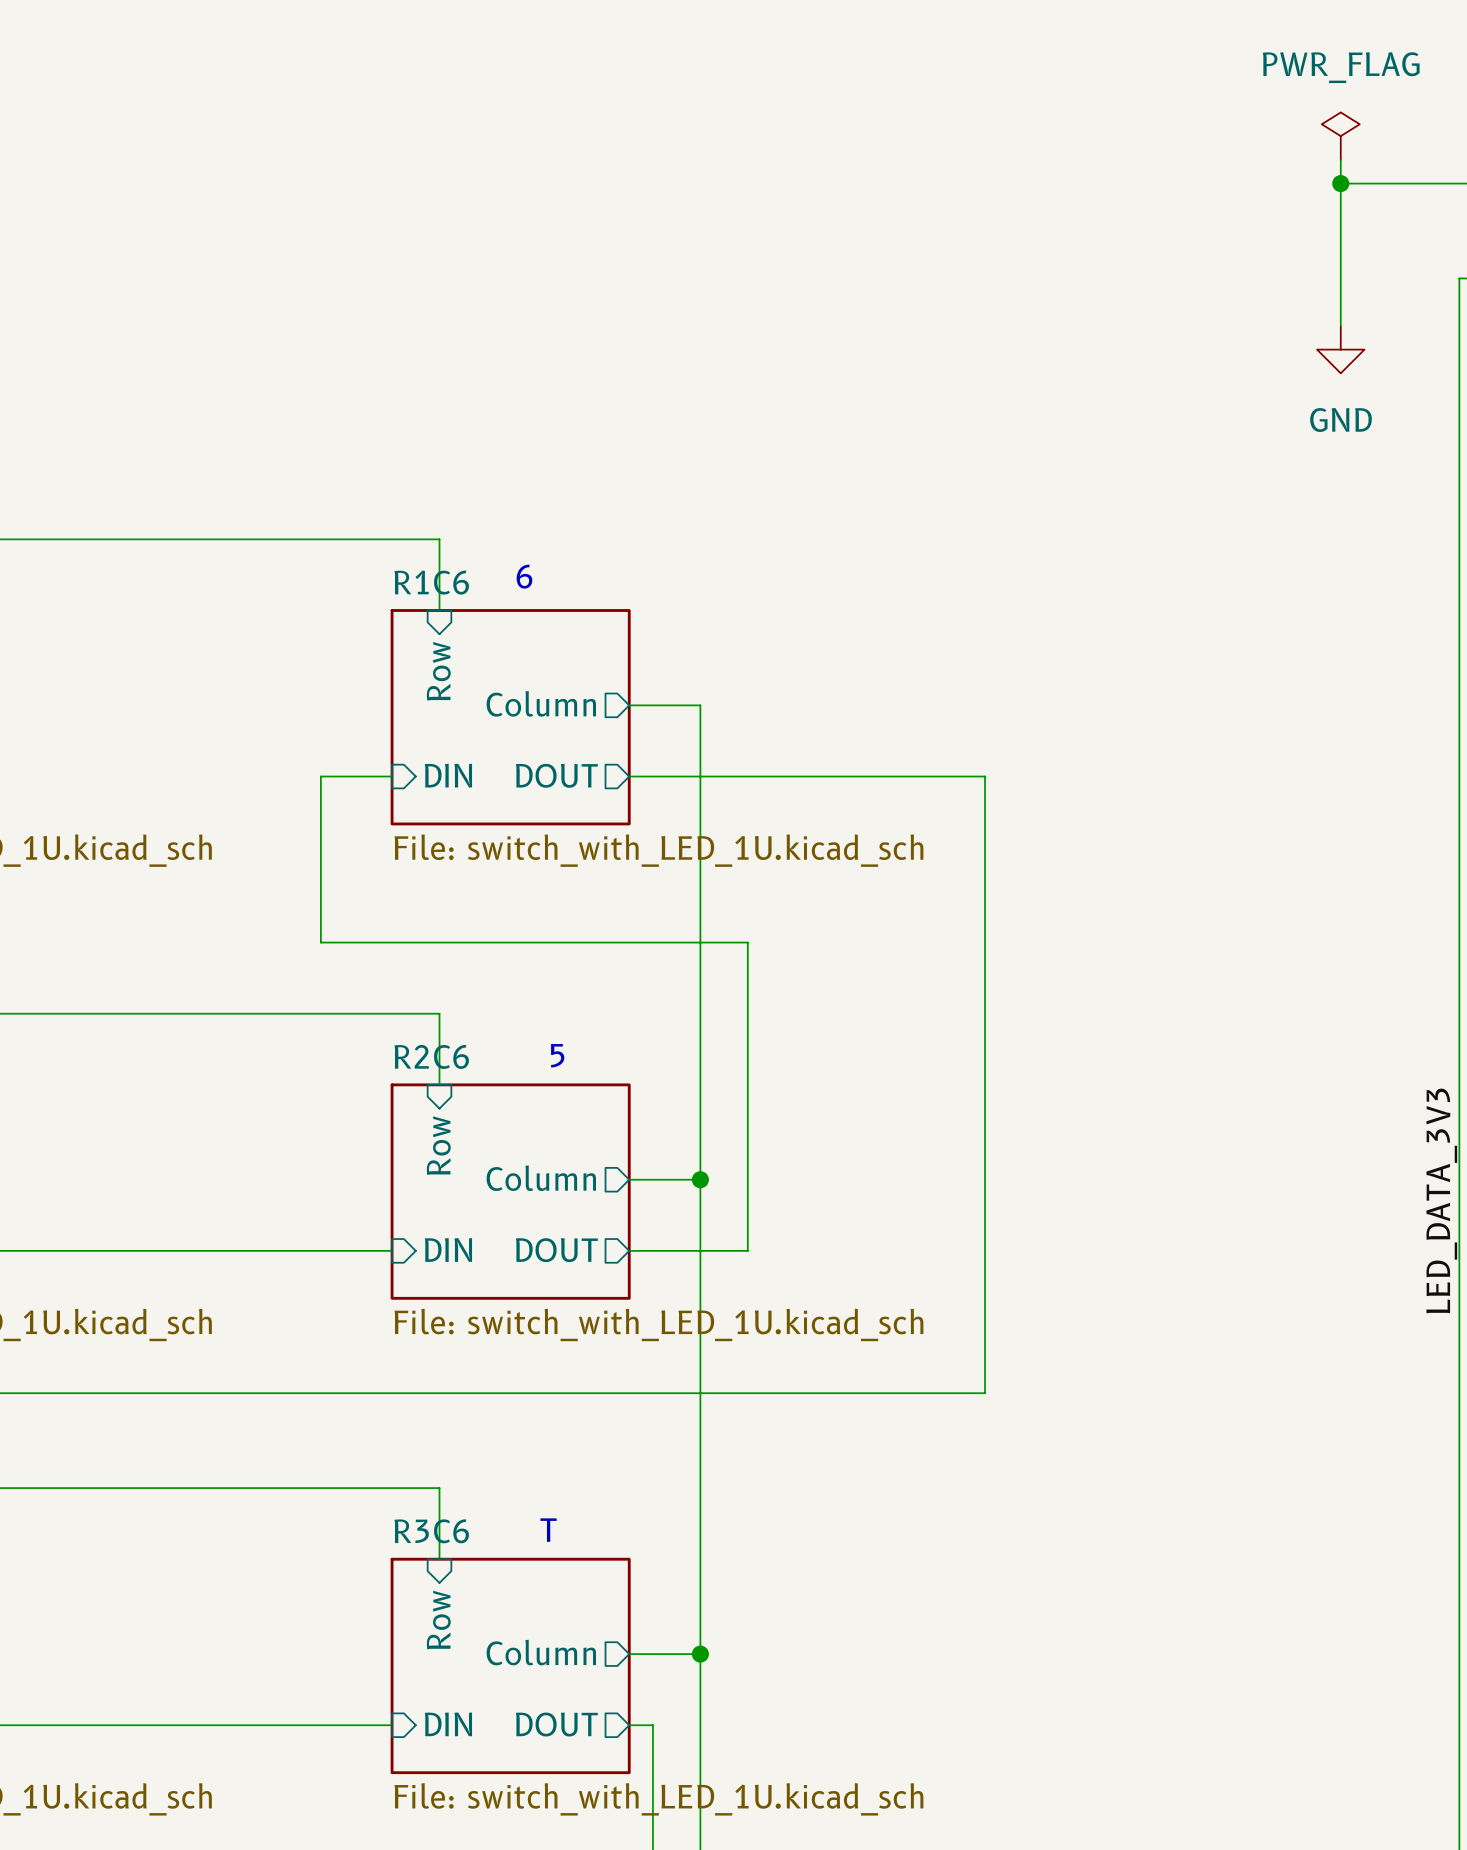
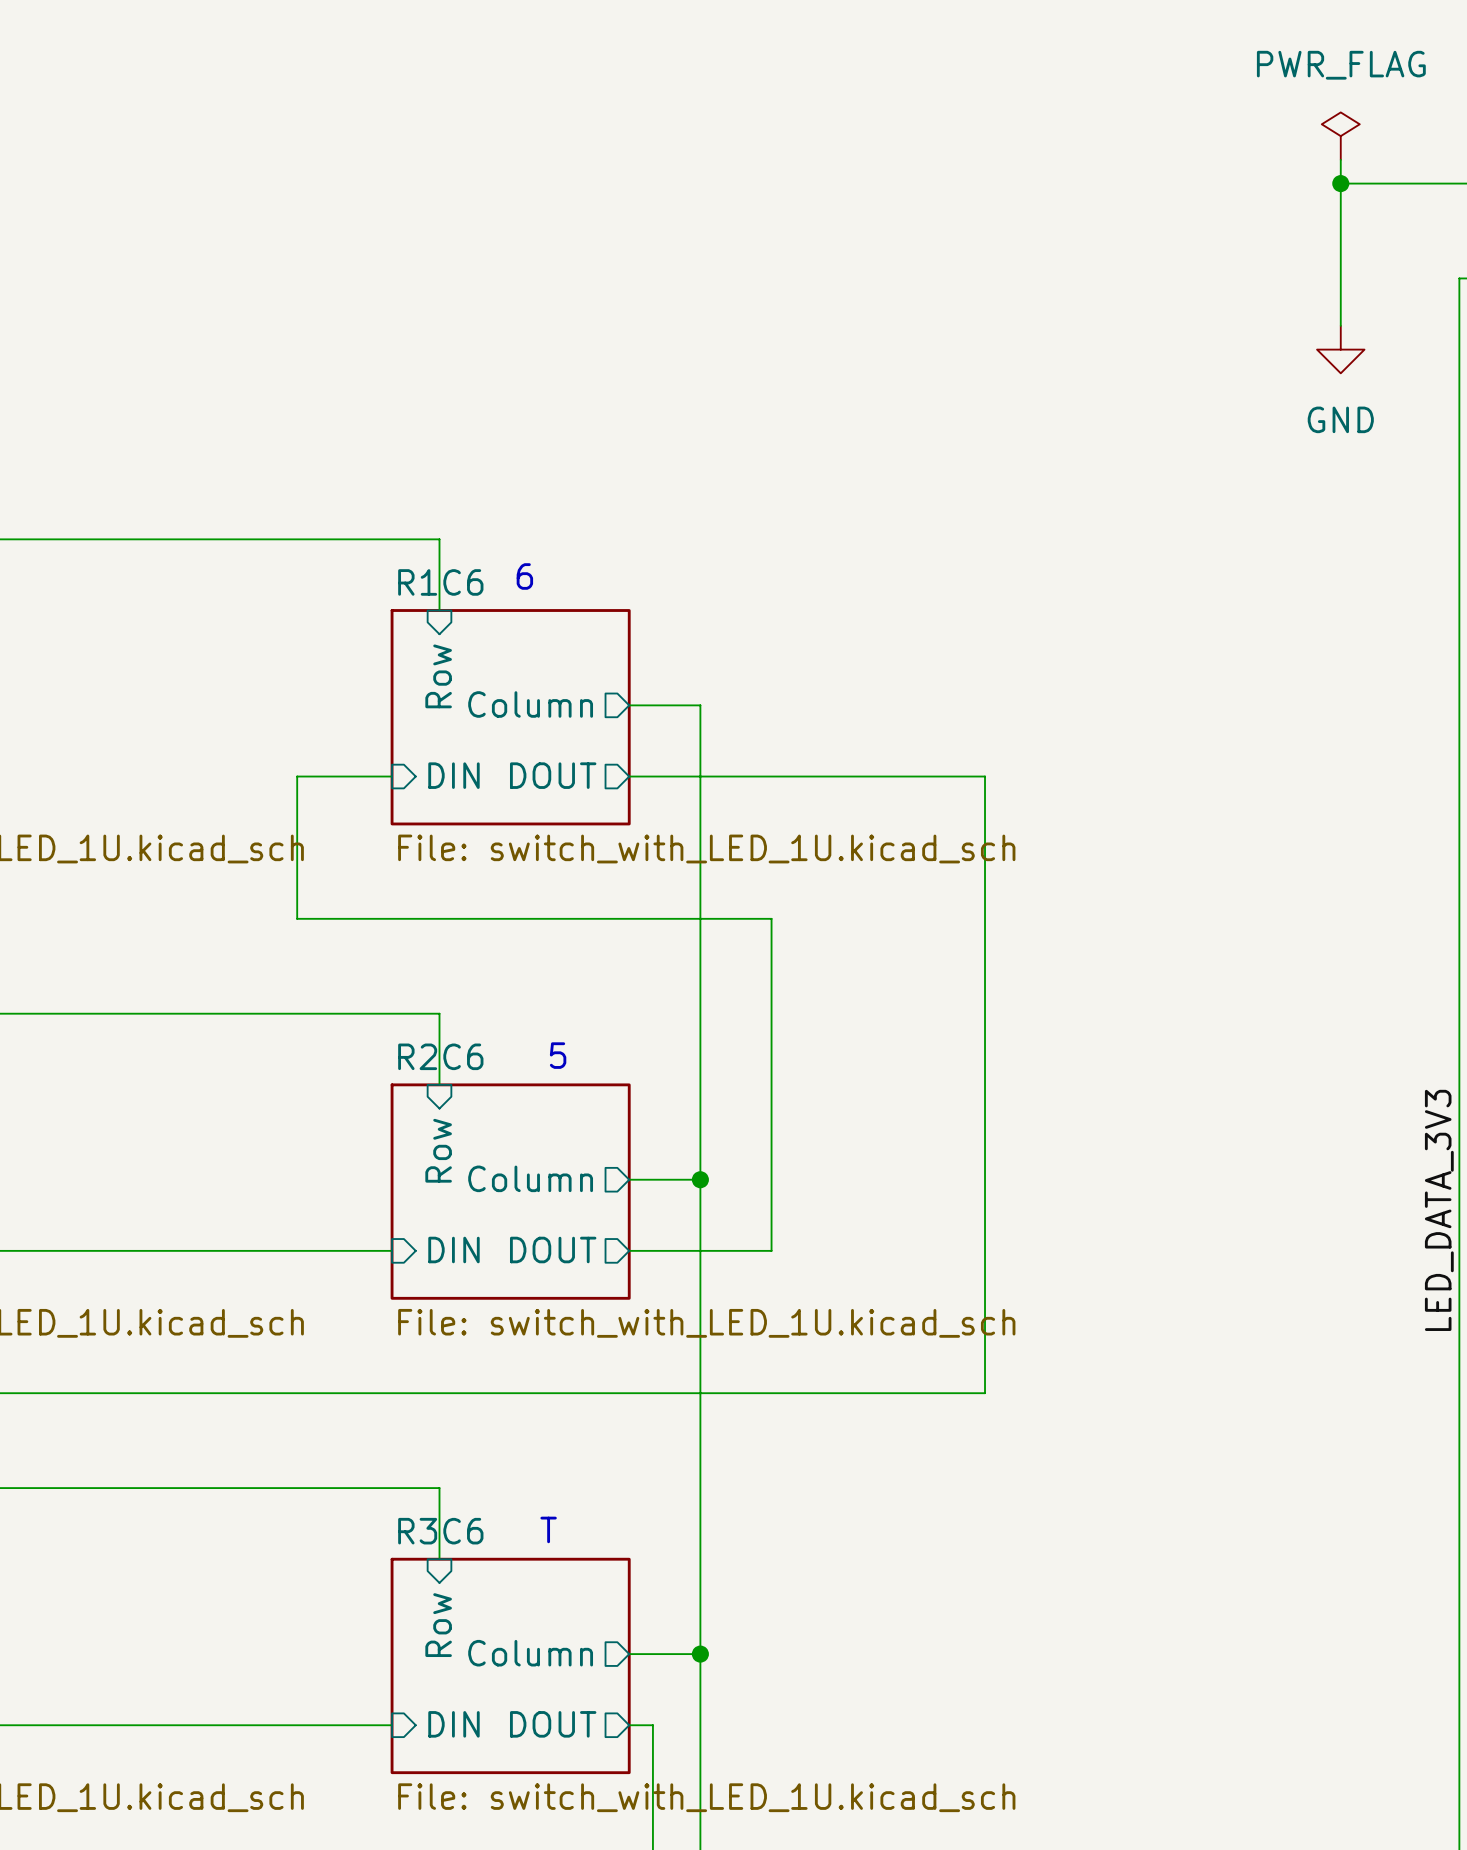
wire: (320, 776) (320, 942) (747, 942) (747, 1250) -> (320, 776) (297, 776) (297, 918) (771, 918) (771, 1250) (747, 1250)

